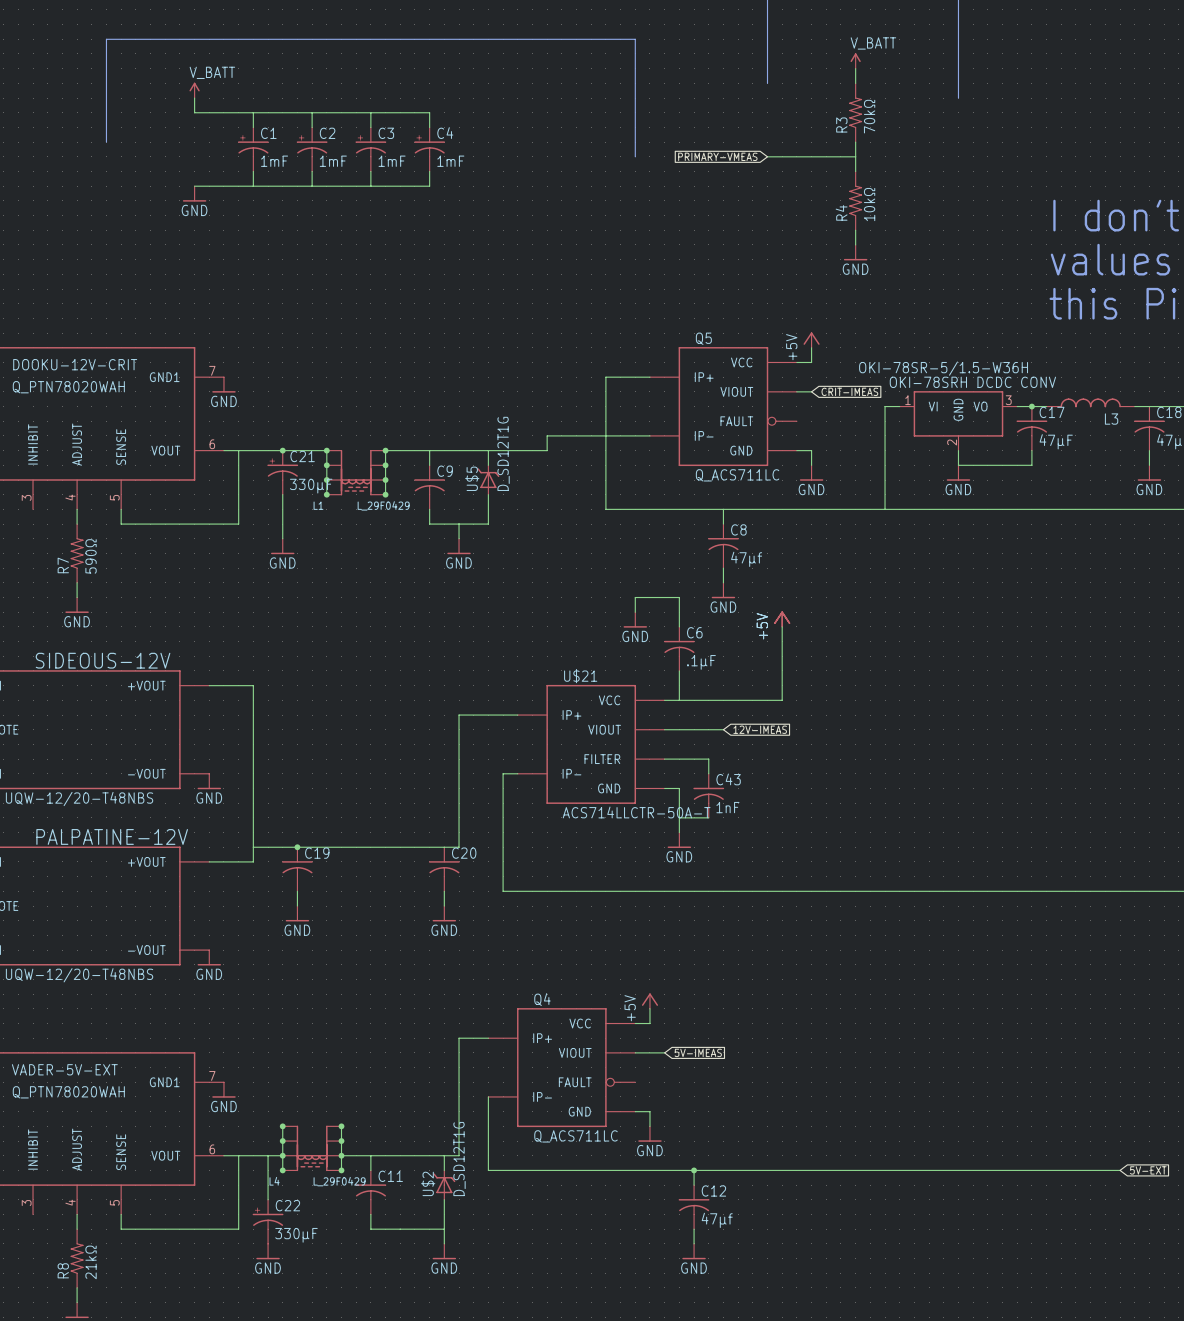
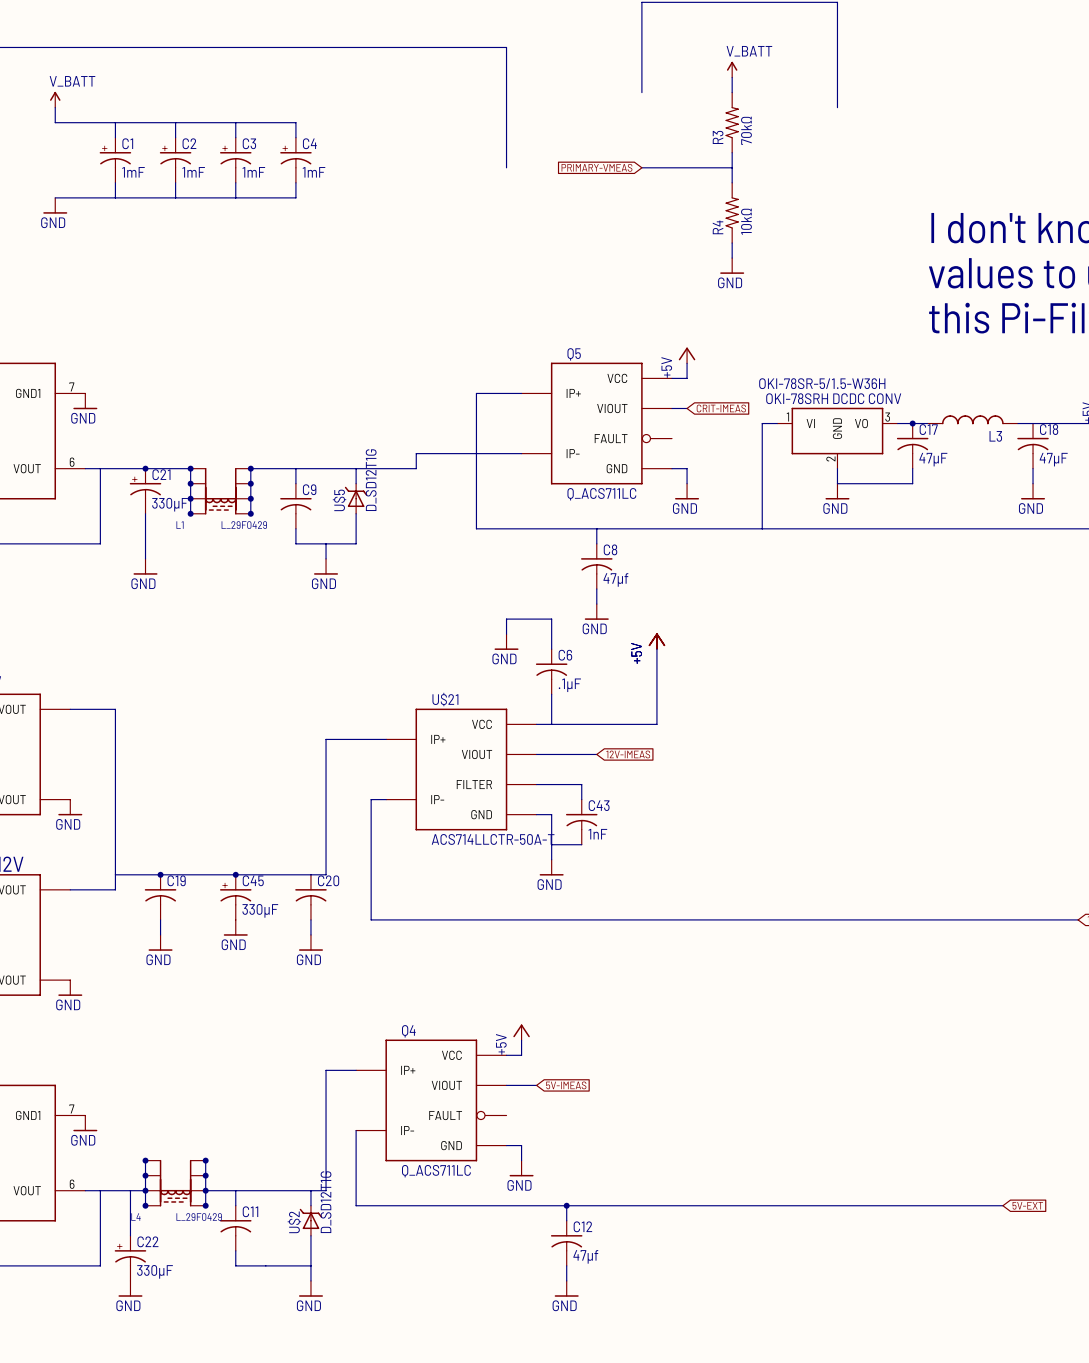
junction: none -> (235, 874)
C45: none -> 330µF (235, 897)
power symbol: none -> GND (235, 927)

